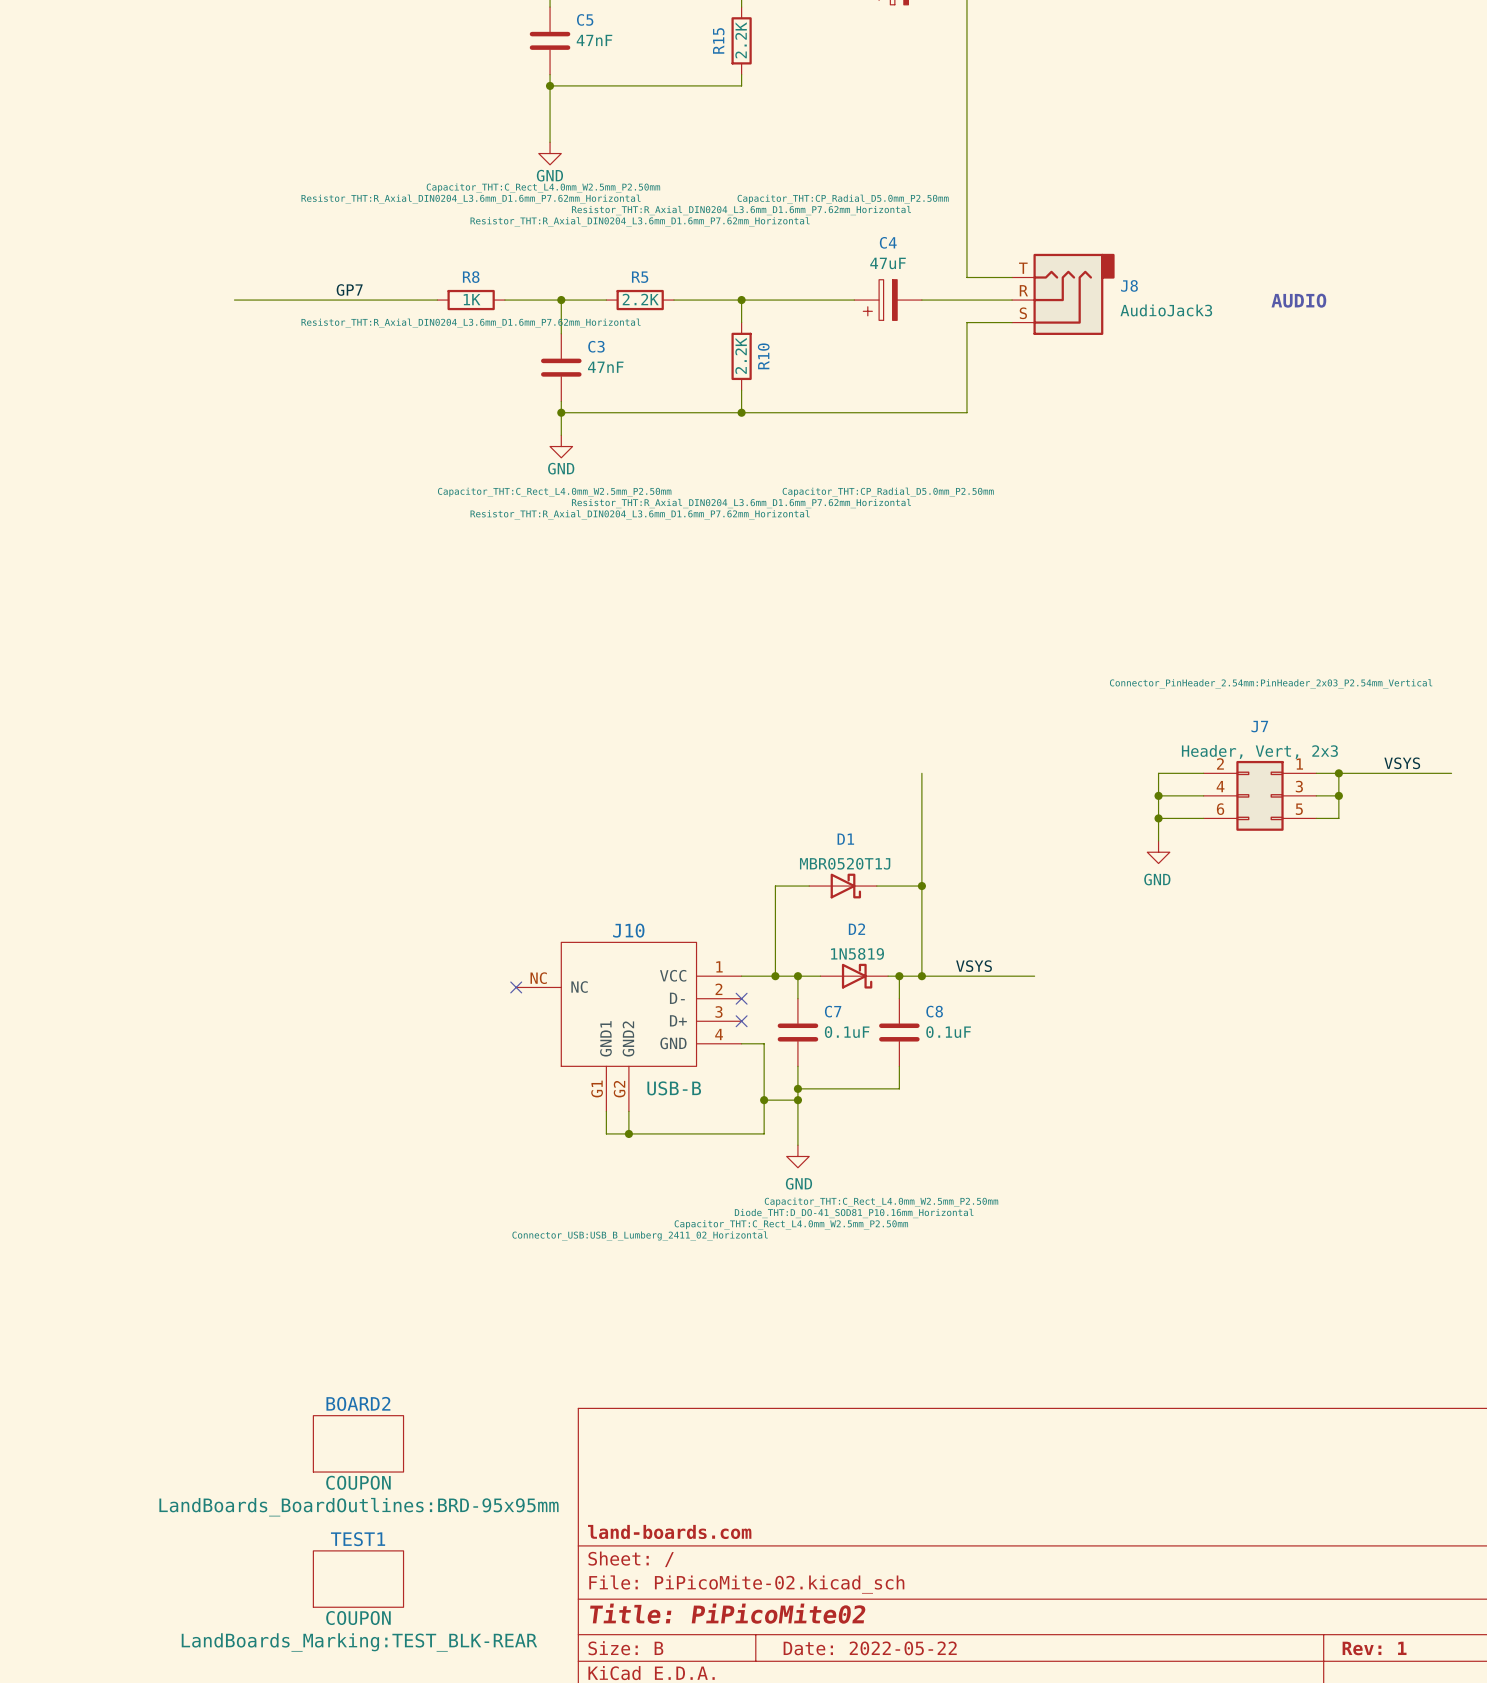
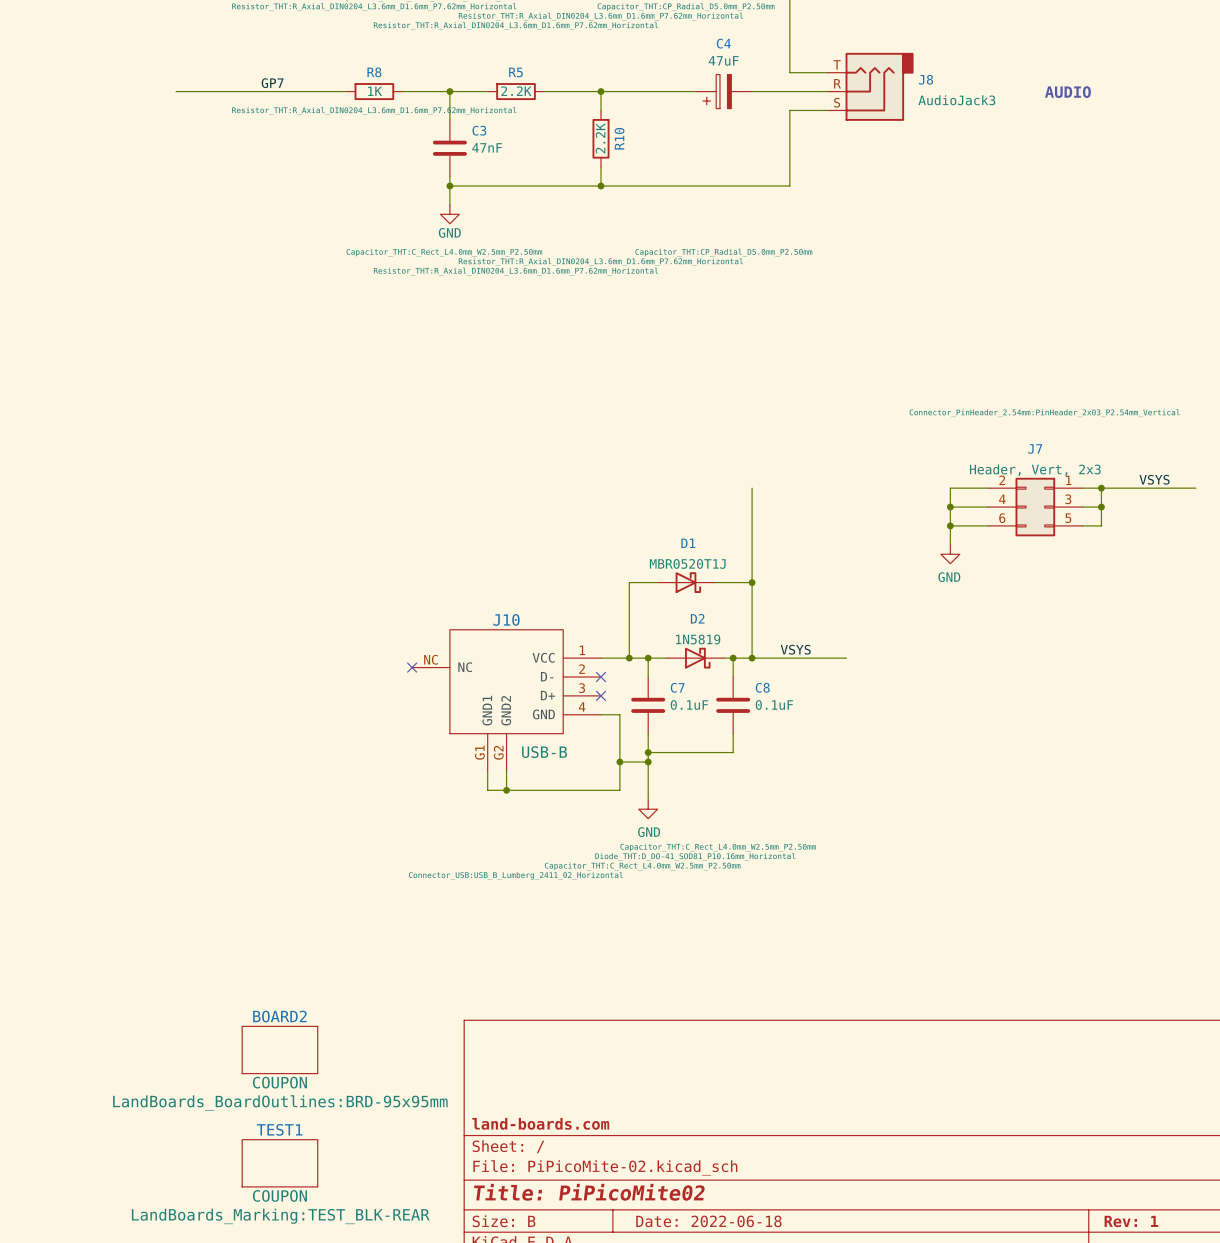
title block: Date: 2022-05-22 (870, 1648) -> Date: 2022-06-18 (708, 1221)

